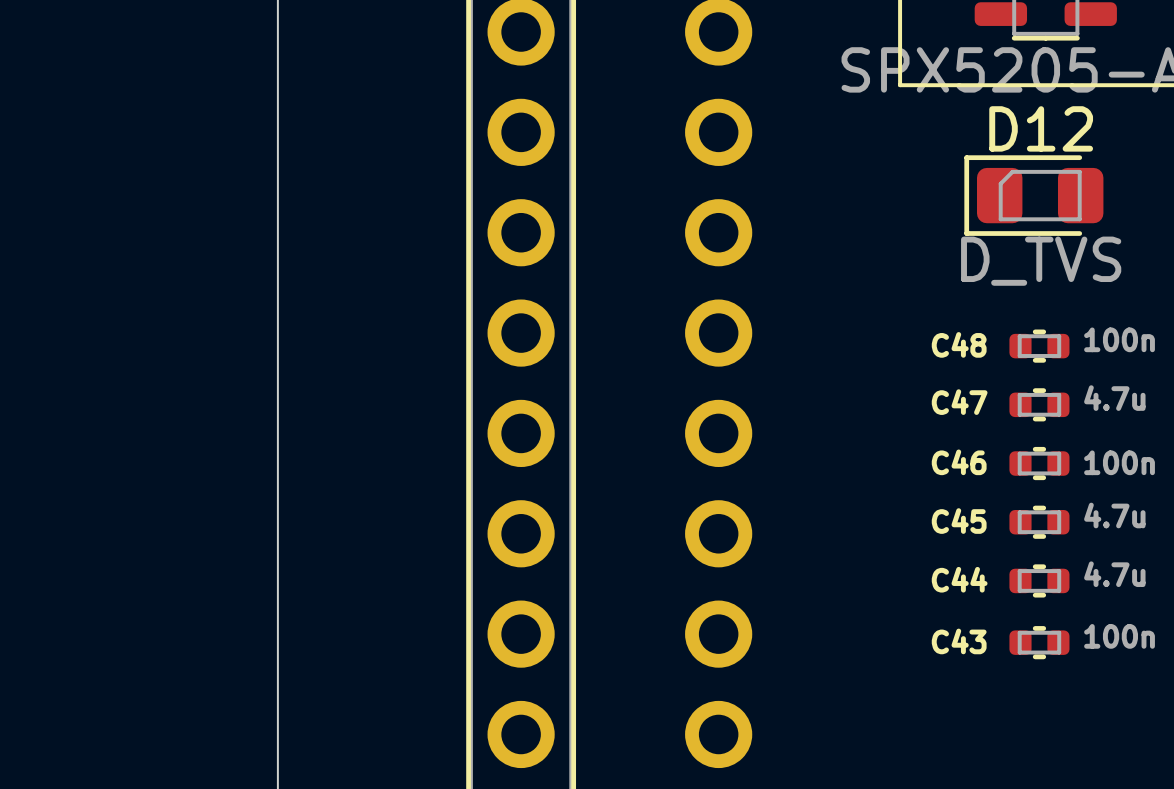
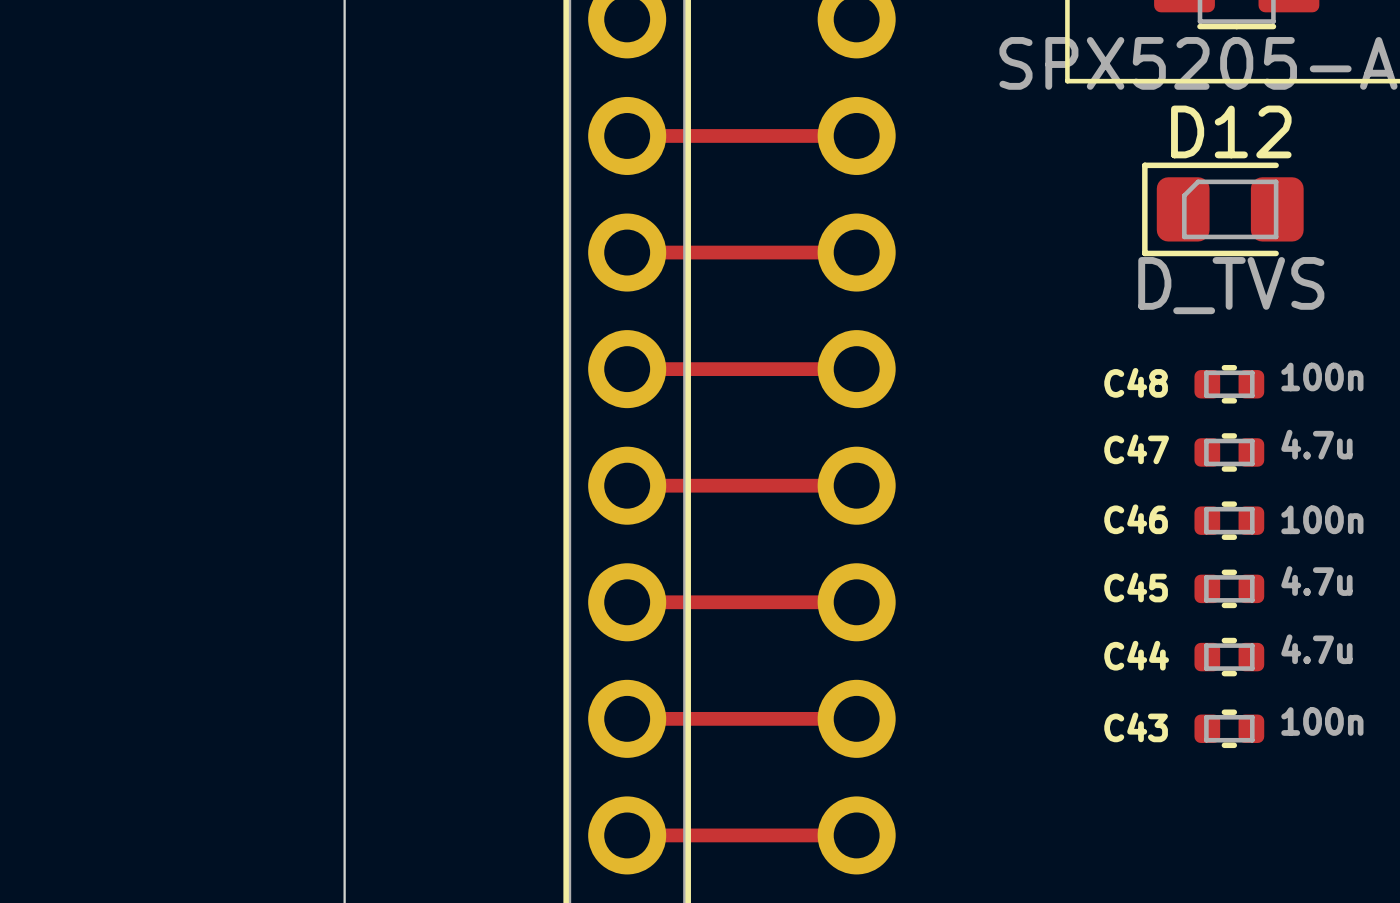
track: none -> (627, 135) (856, 135)
track: none -> (627, 252) (856, 252)
track: none -> (627, 369) (856, 369)
track: none -> (627, 485) (856, 485)
track: none -> (627, 602) (856, 602)
track: none -> (627, 718) (856, 718)
track: none -> (627, 835) (856, 835)

